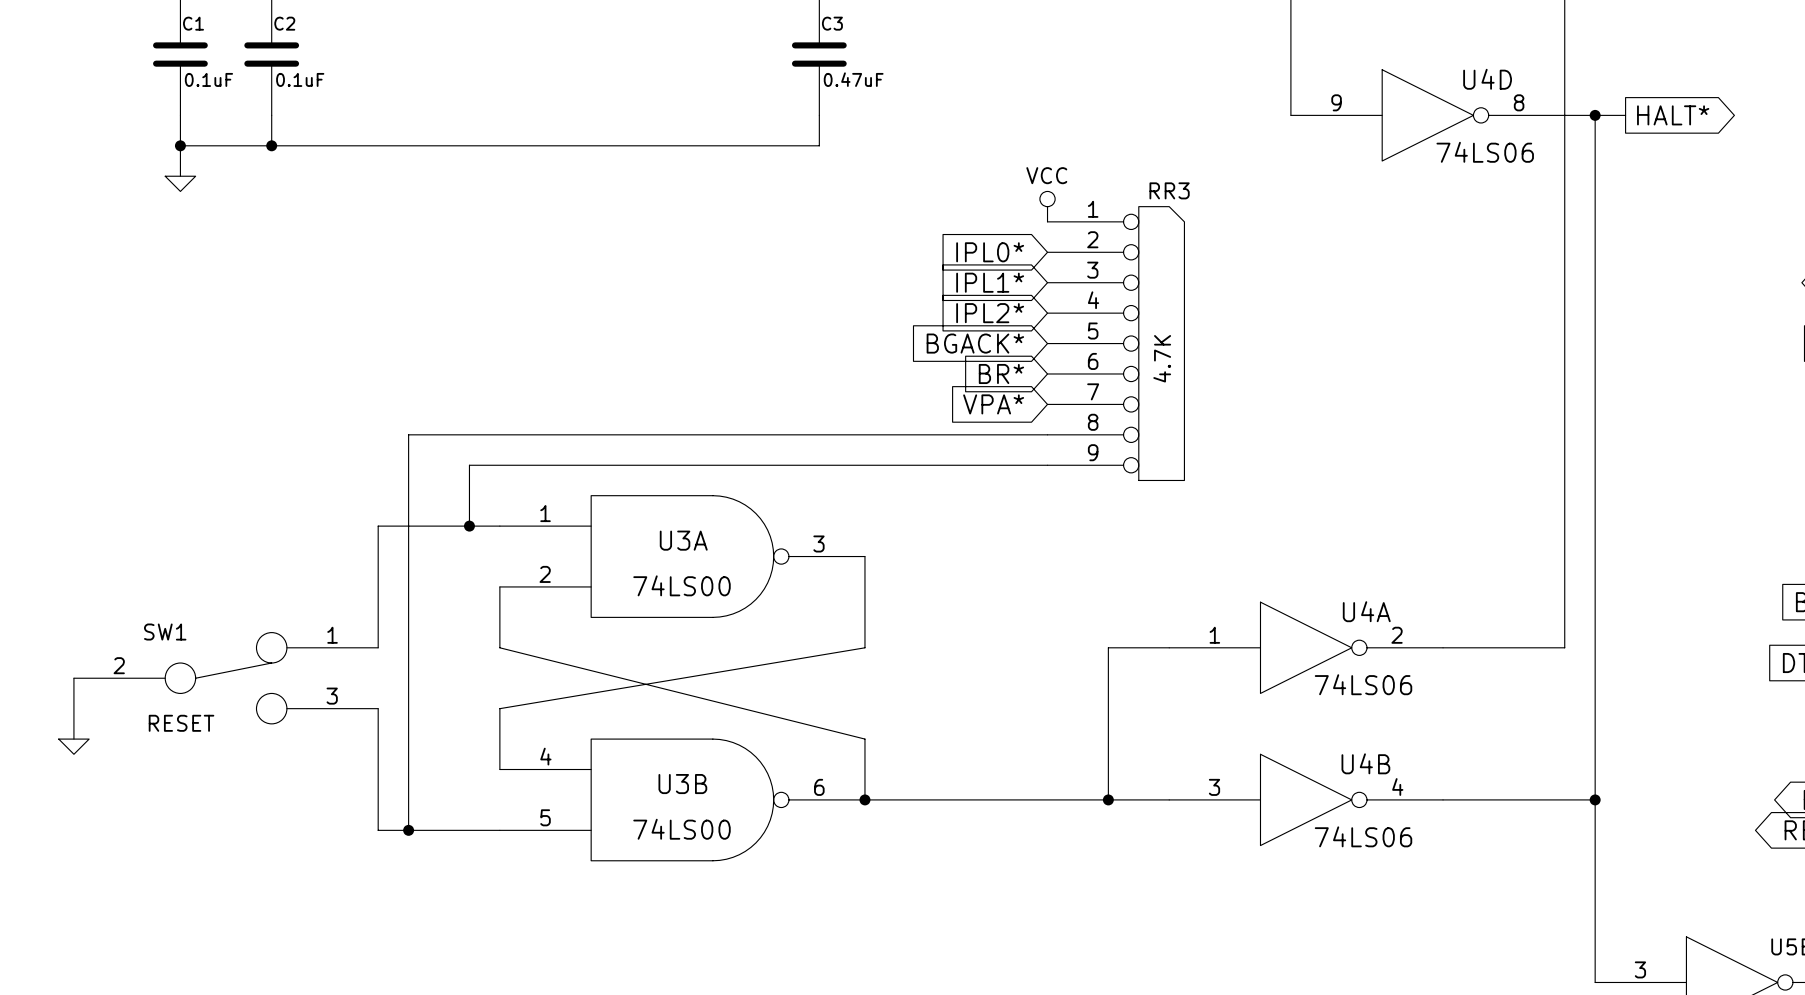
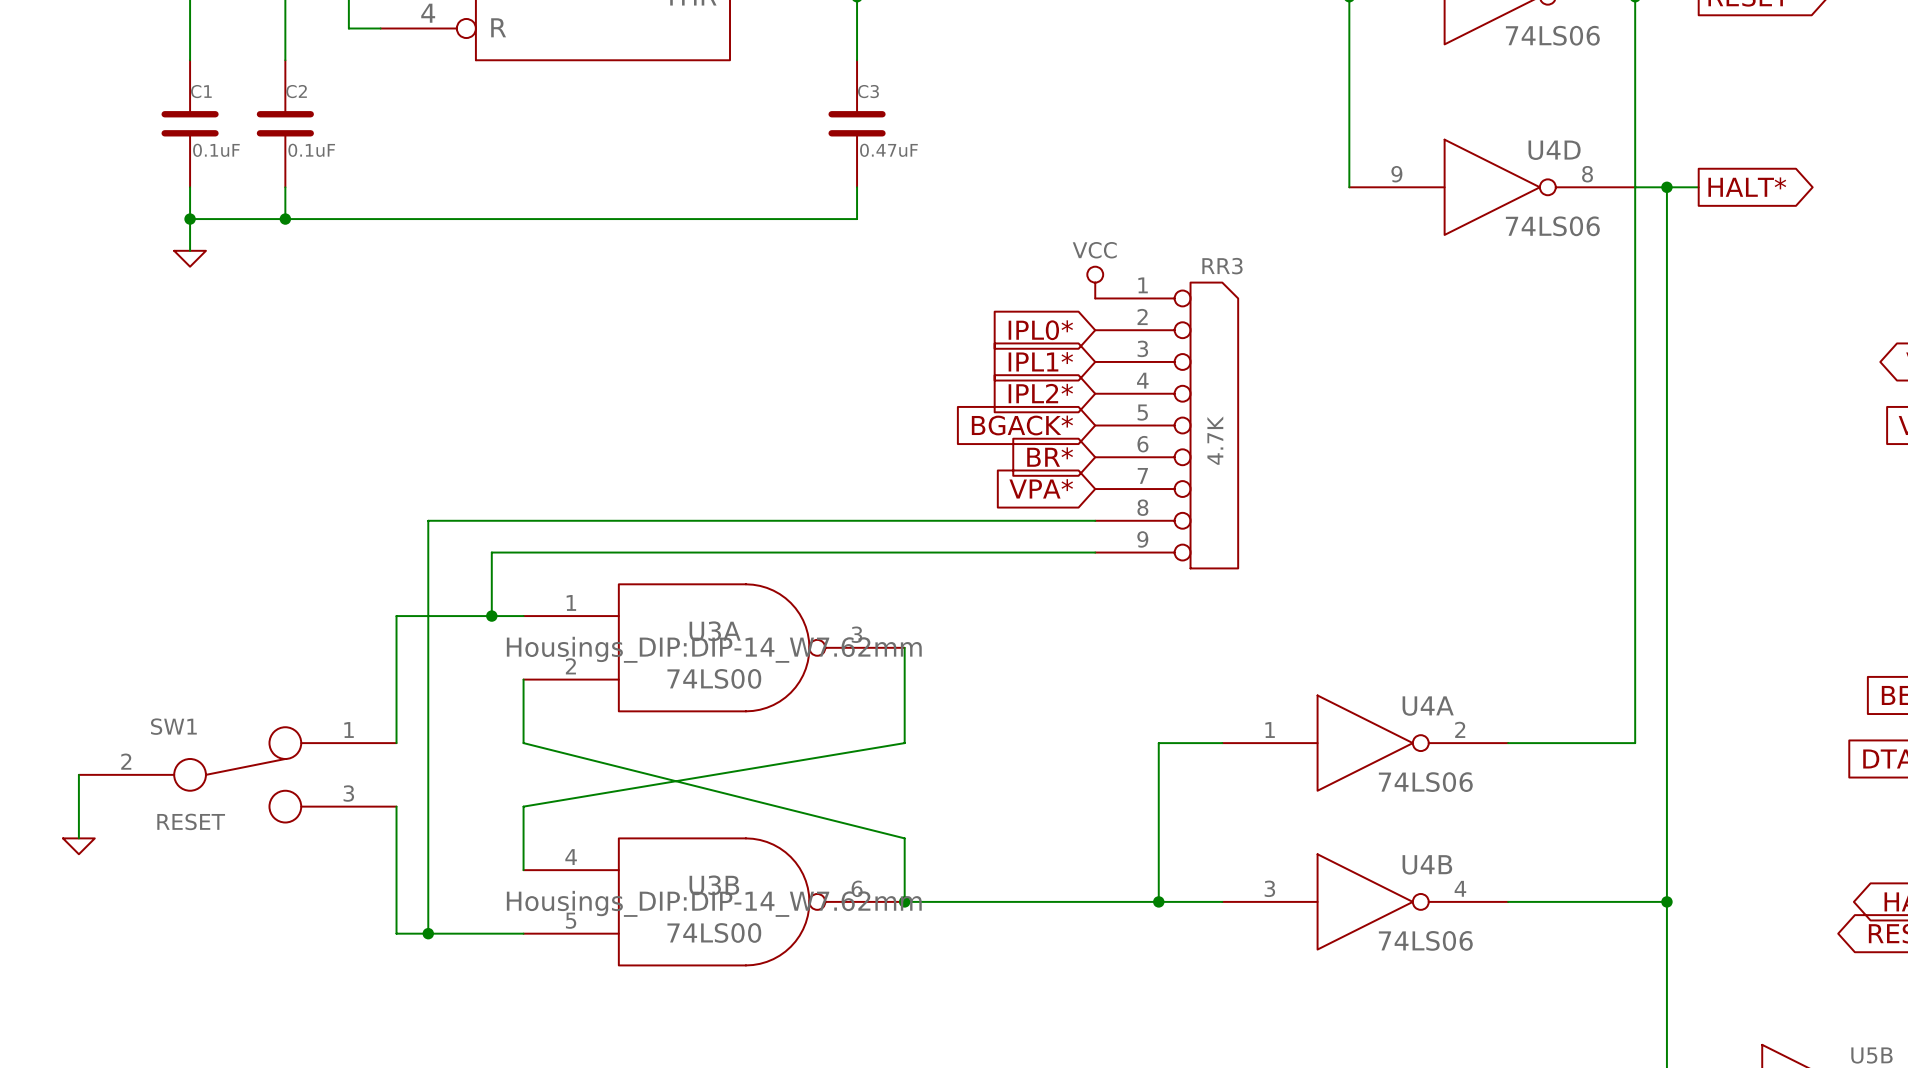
U3A text: none -> Housings_DIP:DIP-14_W7.62mm (714, 649)
U3B text: none -> Housings_DIP:DIP-14_W7.62mm (714, 903)

